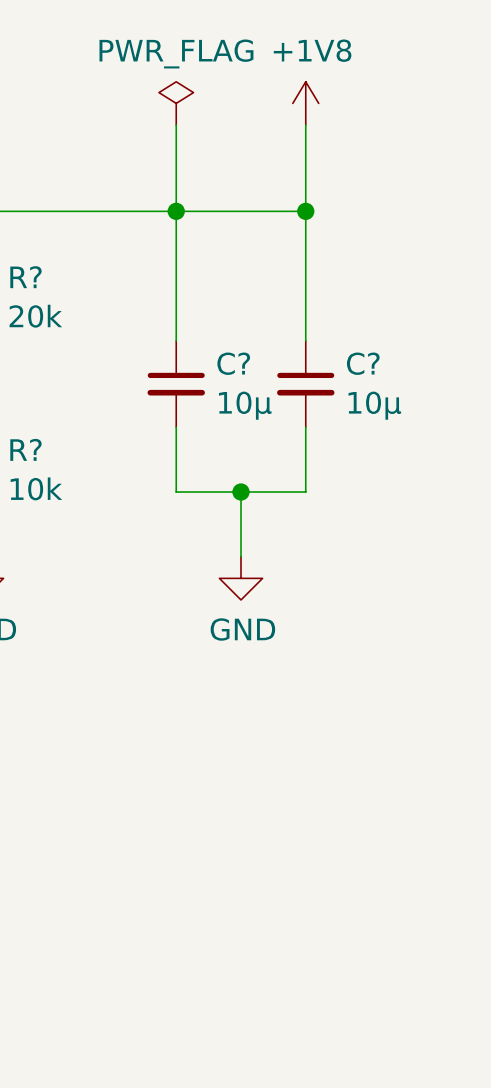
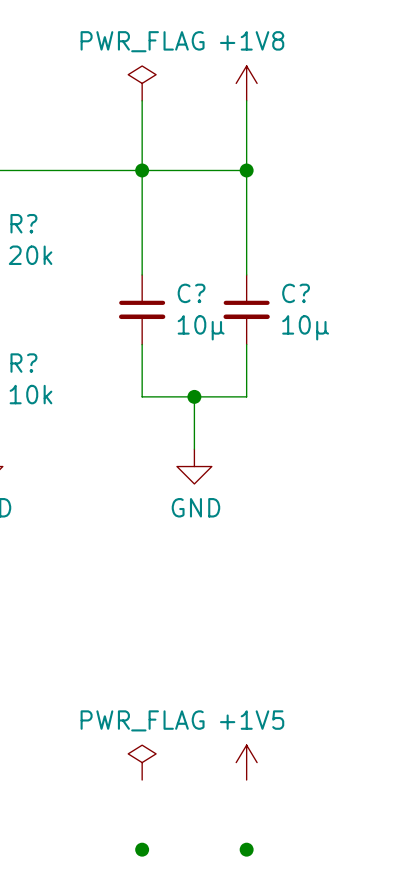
power symbol: none -> PWR_FLAG (142, 762)
power symbol: none -> +1V5 (246, 762)
junction: none -> (142, 849)
junction: none -> (246, 849)

